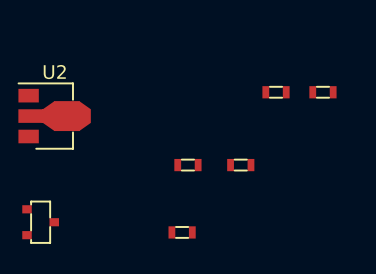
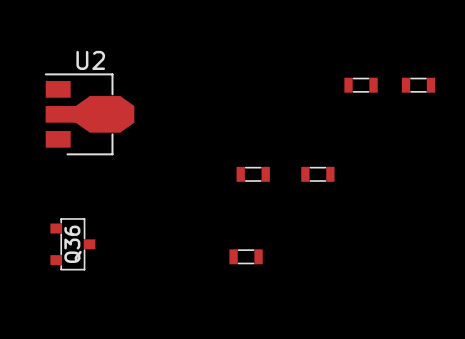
Q36 name: none -> Q36 (73, 244)

